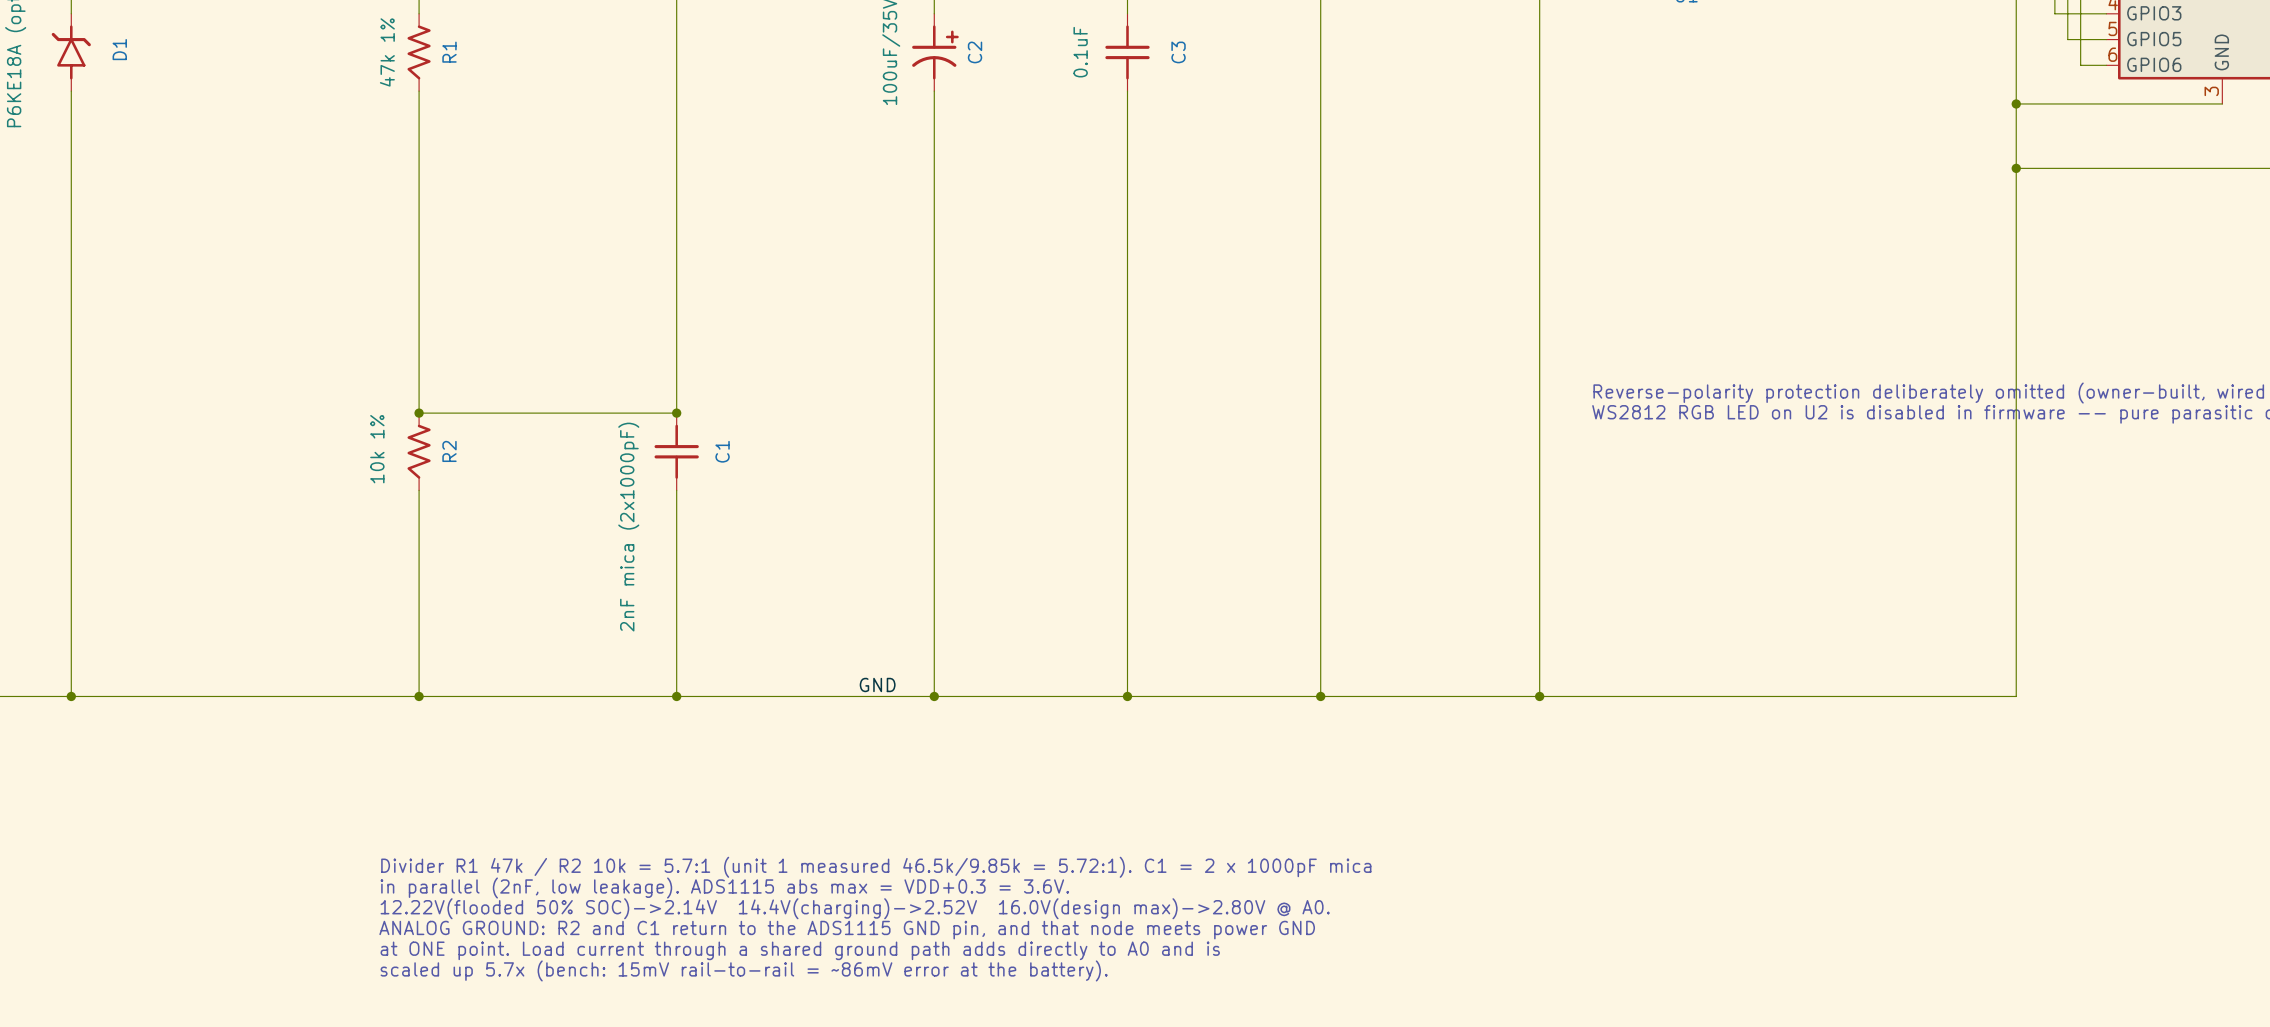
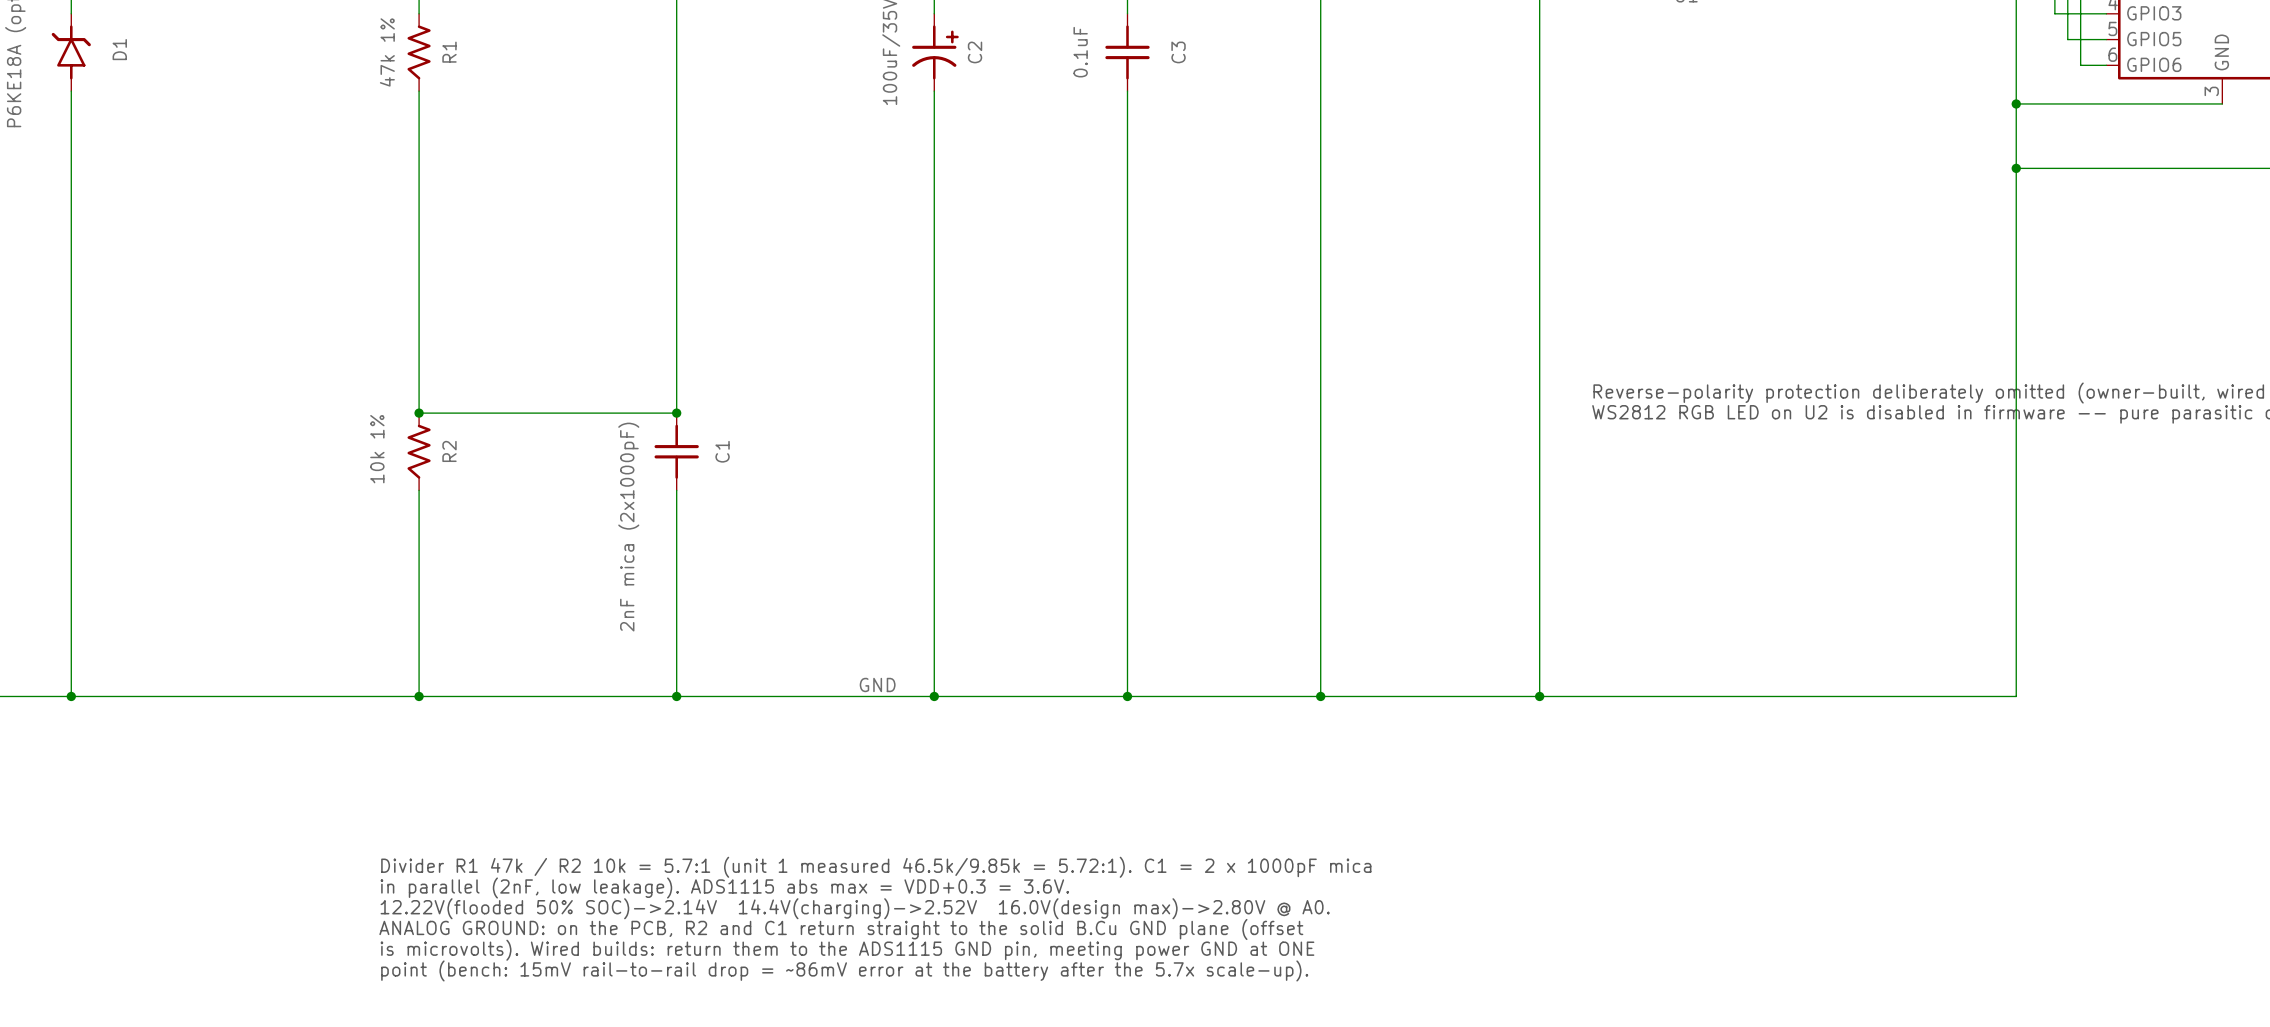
text: ANALOG GROUND: R2 and C1 return to the ADS1115 GND pin, and that node meets power GND (847, 930) -> ANALOG GROUND: on the PCB, R2 and C1 return straight to the solid B.Cu GND plane (offset (841, 929)
text: at ONE point. Load current through a shared ground path adds directly to A0 and is (800, 950) -> is microvolts). Wired builds: return them to the ADS1115 GND pin, meeting power GND at ONE (847, 950)
text: scaled up 5.7x (bench: 15mV rail-to-rail = ~86mV error at the battery). (744, 970) -> point (bench: 15mV rail-to-rail drop = ~86mV error at the battery after the 5.7x scale-up). (844, 970)

